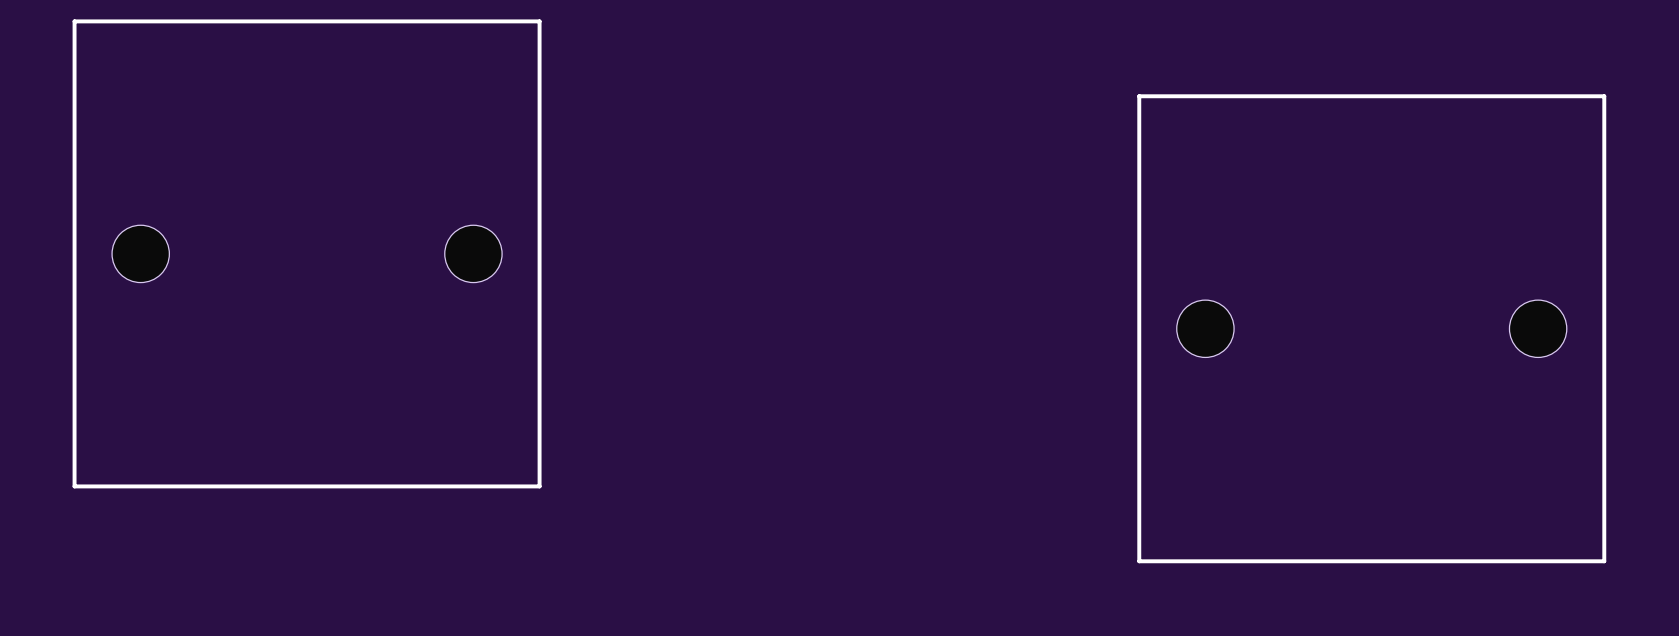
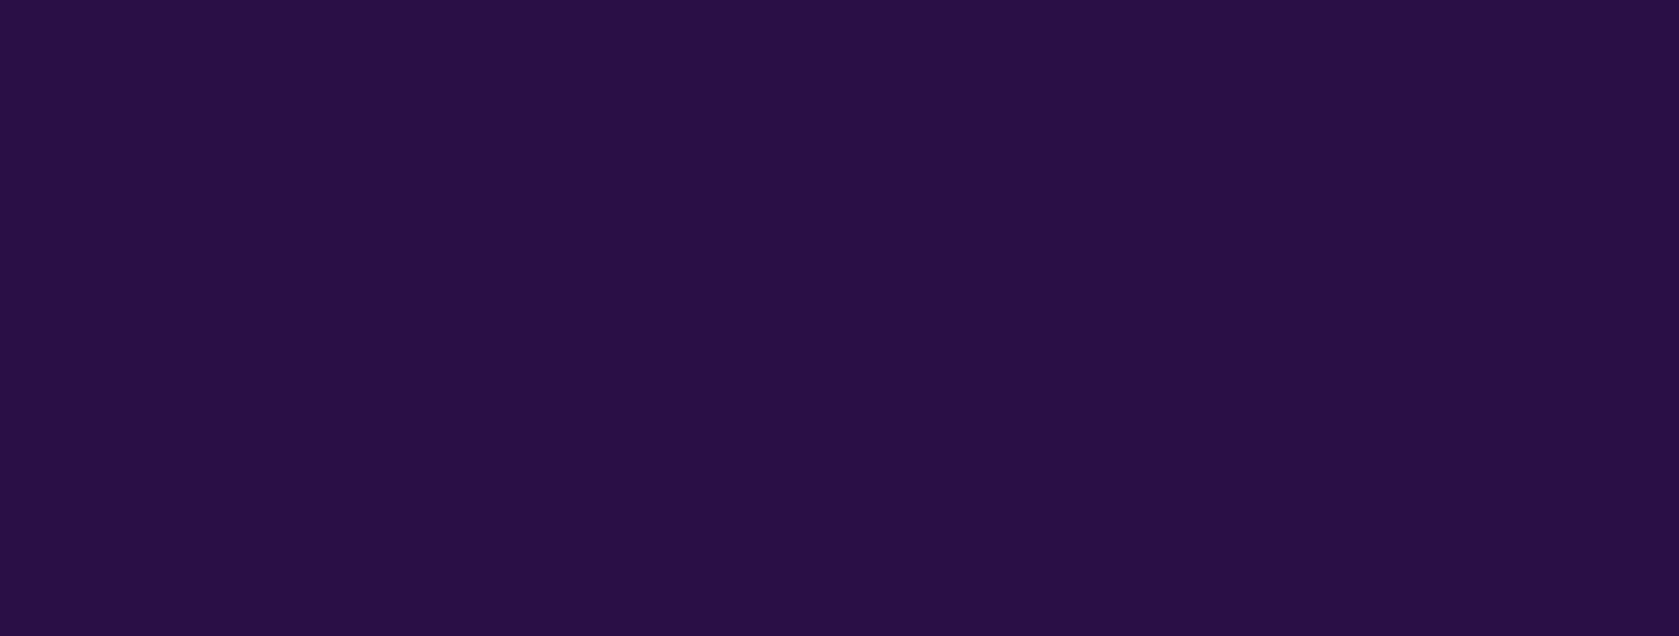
part: (307, 253) -> none
part: (1371, 328) -> none

